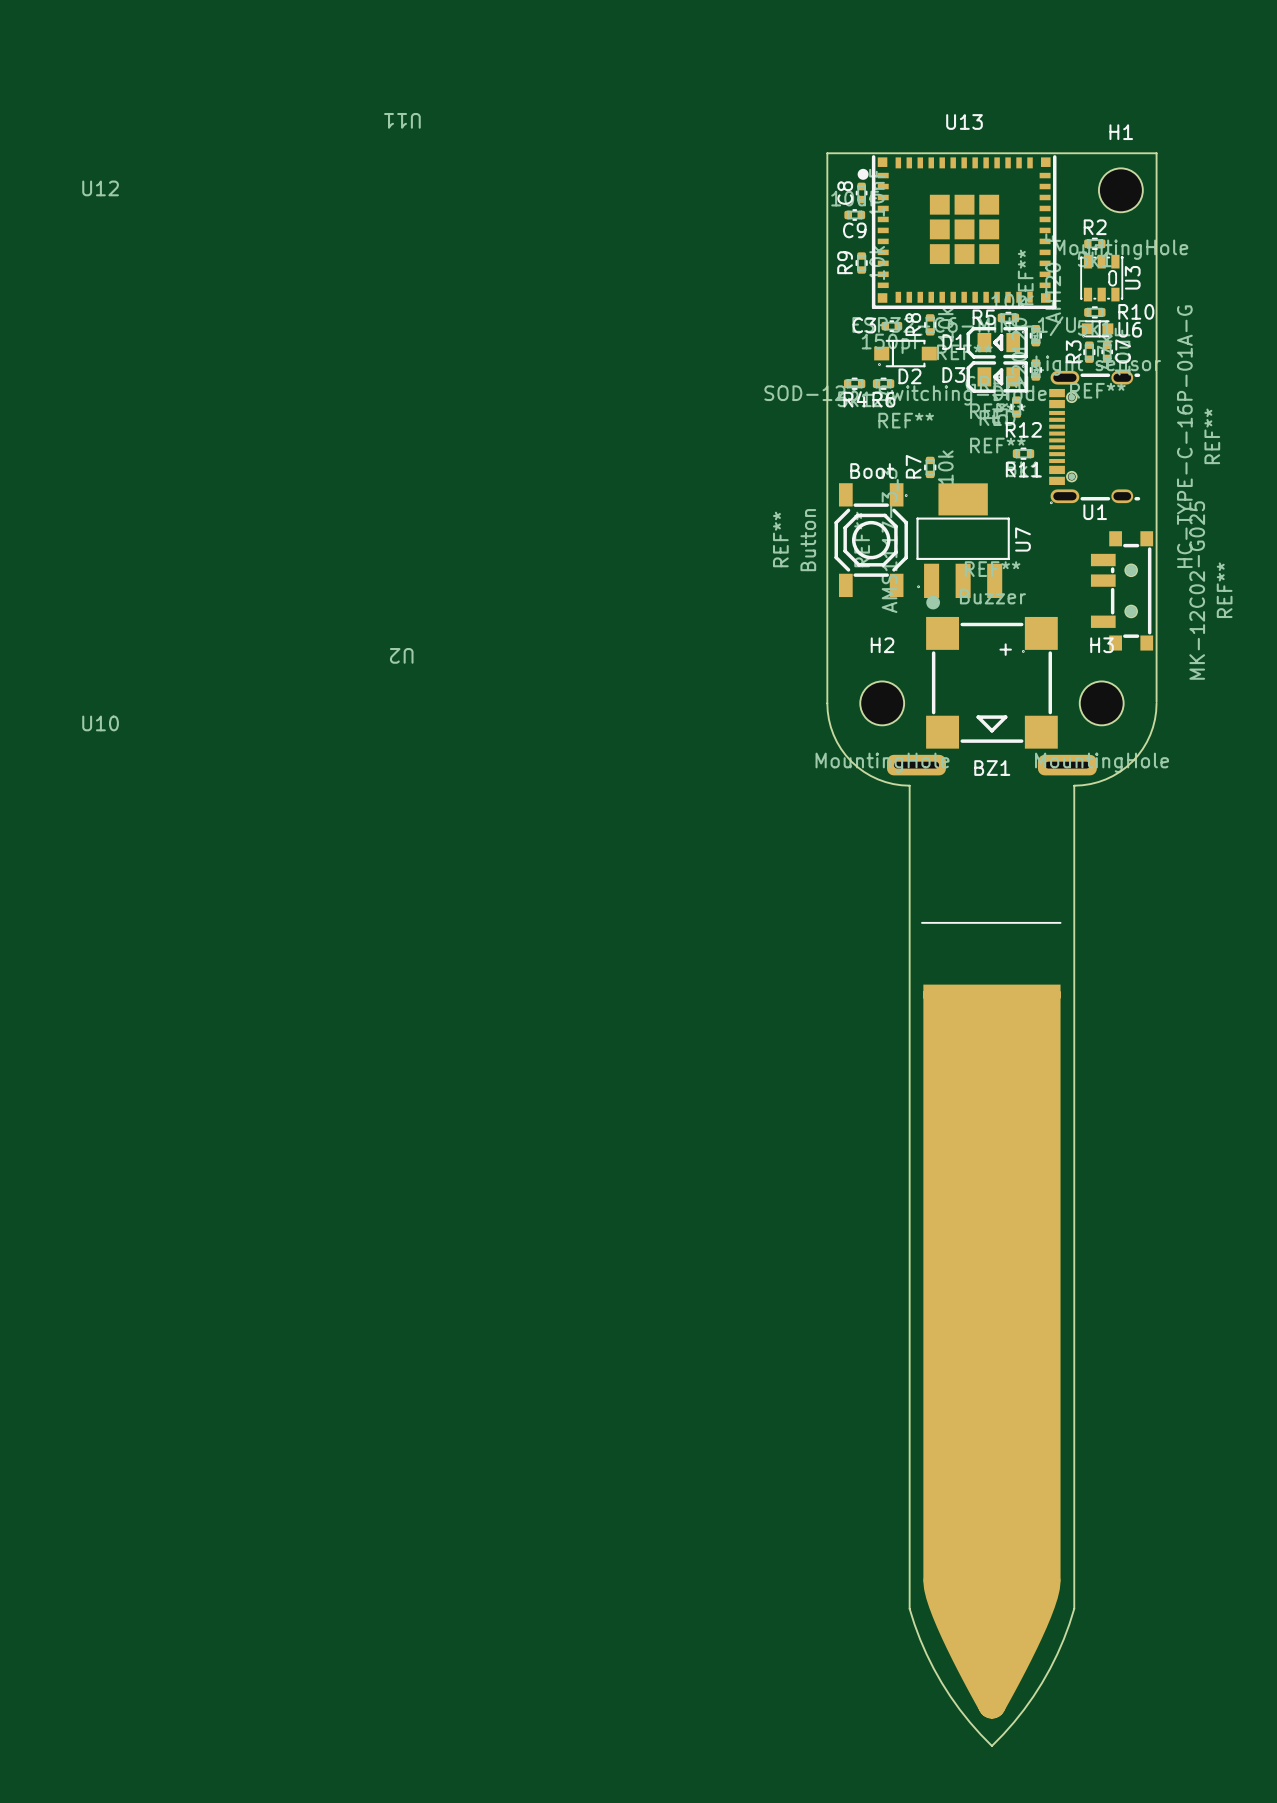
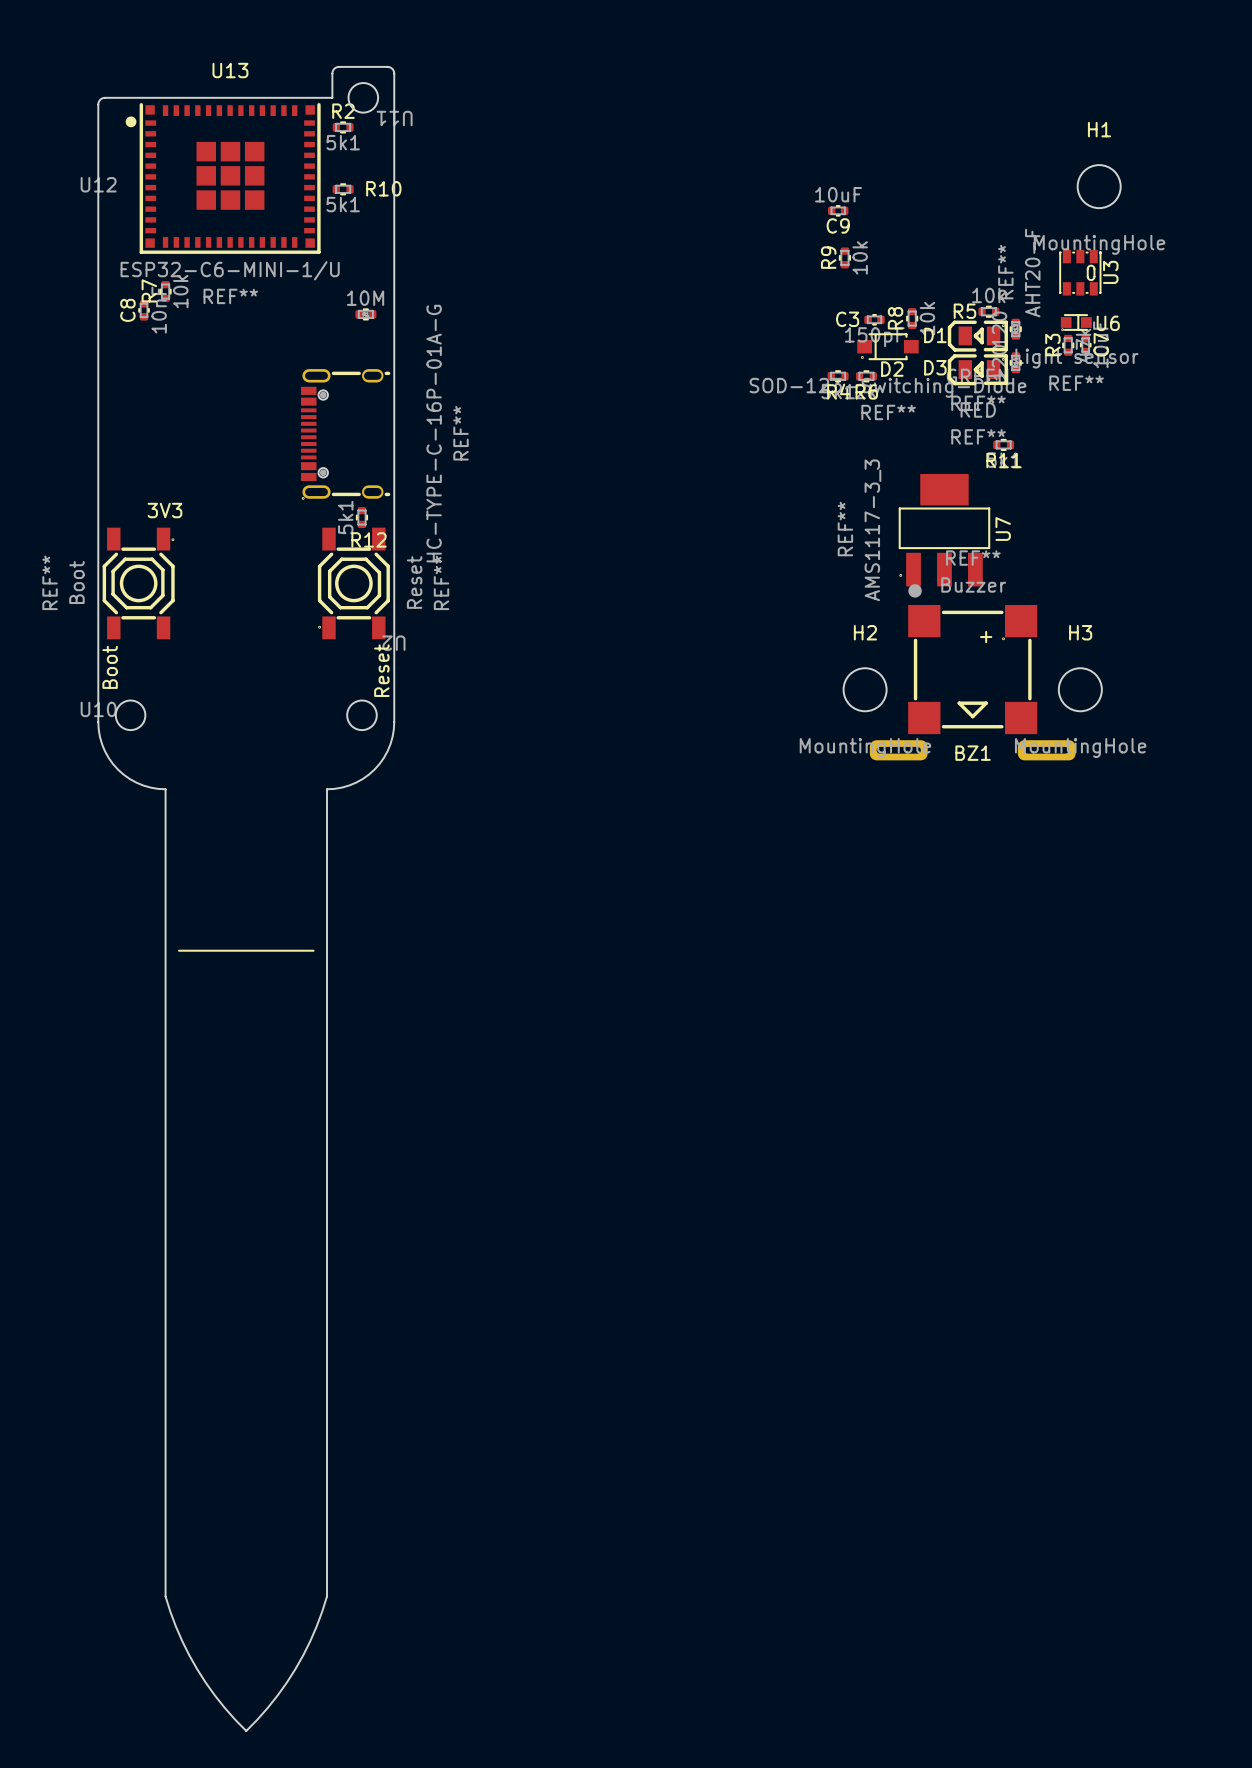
board edge: none -> (339, 66) (388, 66) (394, 72) (394, 722) (392, 737) (387, 751) (374, 769) (356, 782) (341, 787) (326, 789) (326, 1596) (316, 1626) (295, 1669) (267, 1707) (246, 1730) (224, 1707) (197, 1669) (175, 1626) (165, 1596) (165, 789) (143, 785) (123, 774) (112, 763) (104, 751) (98, 729) (98, 104) (100, 99) (105, 97) (332, 97) (332, 71) (339, 66)
round board edge: none -> [347, 82, 379, 114]
C8 position: (861, 193) -> (144, 310)
U13 position: (957, 232) -> (223, 178)
R2 position: (1094, 243) -> (343, 127)
R10 position: (1094, 312) -> (343, 189)
part: none -> 10M (365, 314)
R12 position: (1016, 407) -> (361, 517)
U1: HC-TYPE-C-16P-01A-G (1094, 437) -> none
part: none -> HC-TYPE-C-16P-01A-G (345, 434)
R7 position: (930, 467) -> (165, 291)
text: none -> 3V3 (164, 510)
Boot: Button (871, 540) -> none
part: MK-12C02-G025 (1122, 590) -> none
part: none -> Boot (138, 583)
part: none -> Reset (353, 583)
text: none -> Boot (110, 667)
text: none -> Reset (381, 670)
board edge: (1156, 702) (1156, 153) (827, 153) (827, 711) (833, 734) (841, 749) (851, 761) (863, 771) (878, 779) (893, 784) (909, 785) -> none
board edge: (1156, 703) (1154, 719) (1150, 734) (1142, 749) (1132, 761) (1119, 771) (1105, 779) (1090, 784) (1074, 785) -> none
round board edge: none -> [115, 699, 147, 731]
round board edge: none -> [346, 699, 378, 731]
line: none -> (179, 950) (313, 950)
part: (991, 1265) -> none

